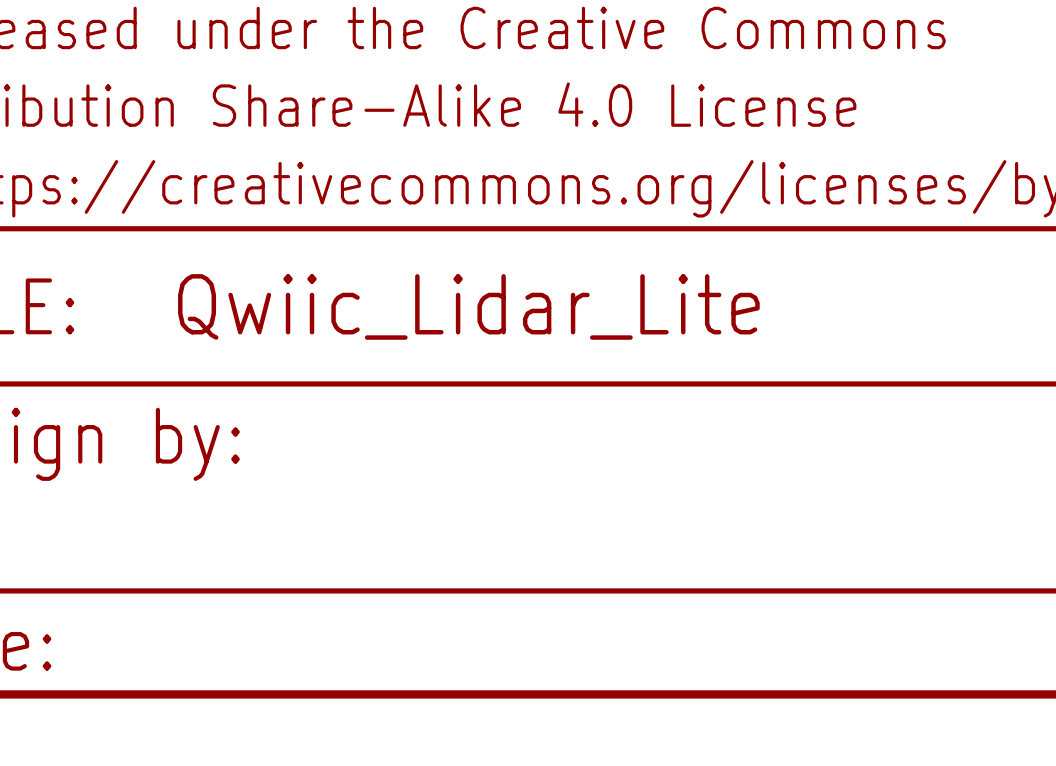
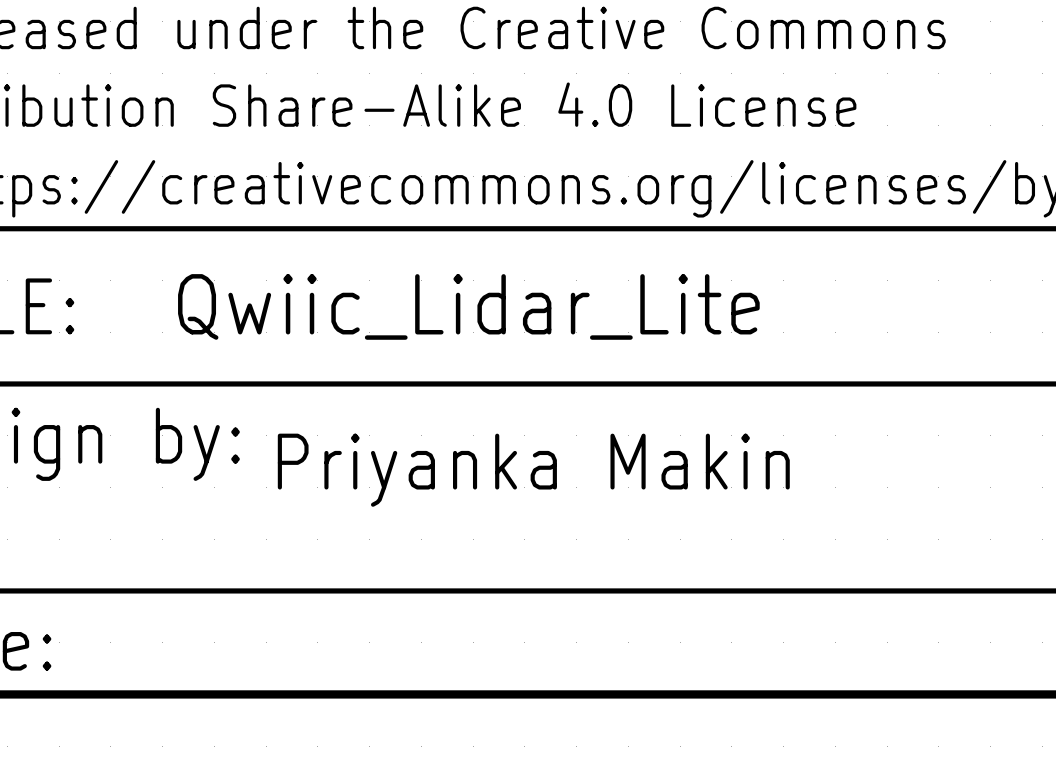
text: none -> Priyanka Makin (533, 470)

